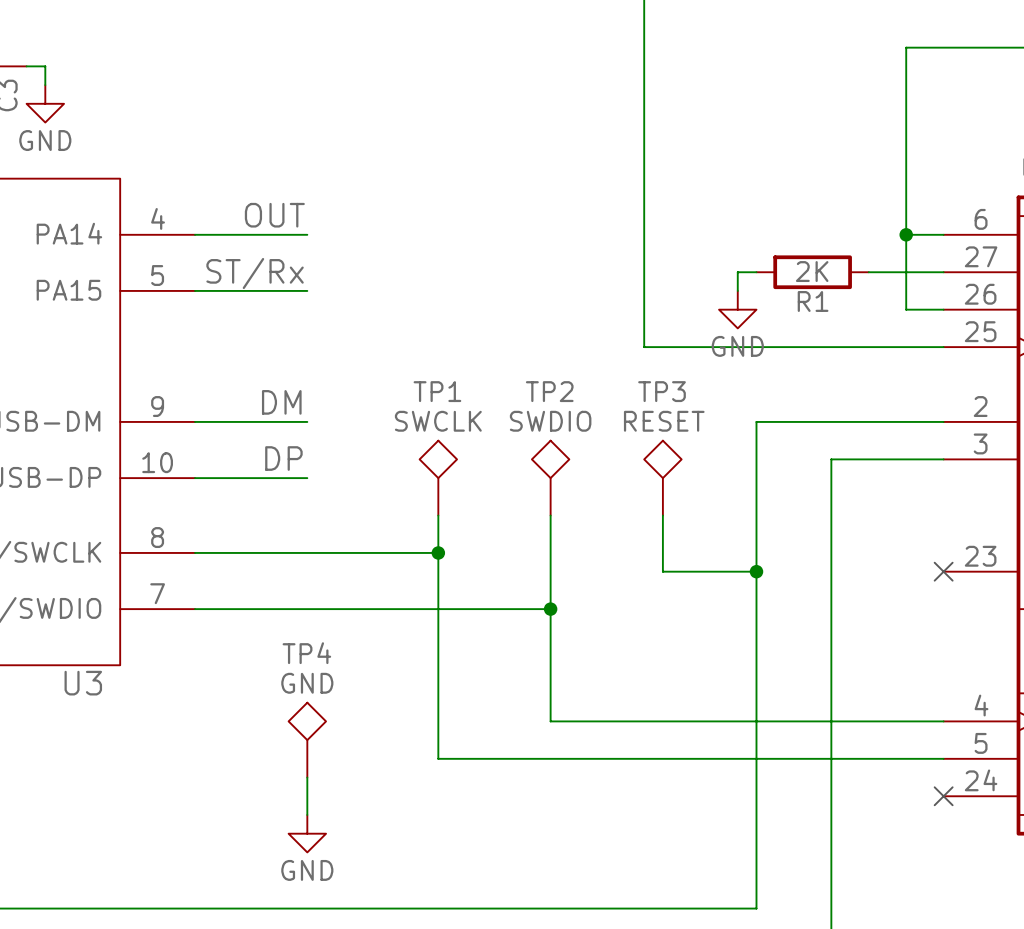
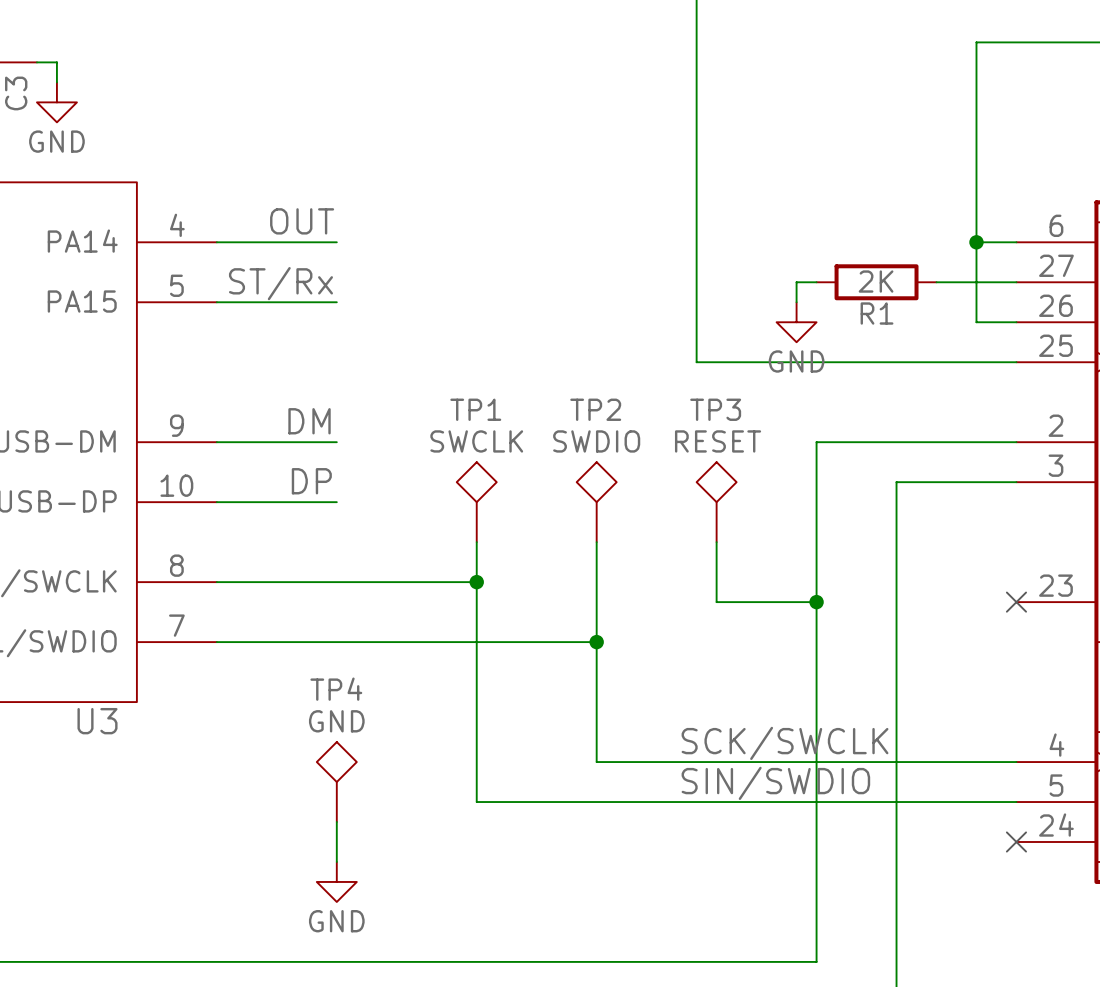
label: none -> SCK/SWCLK (785, 743)
label: none -> SIN/SWDIO (775, 783)

